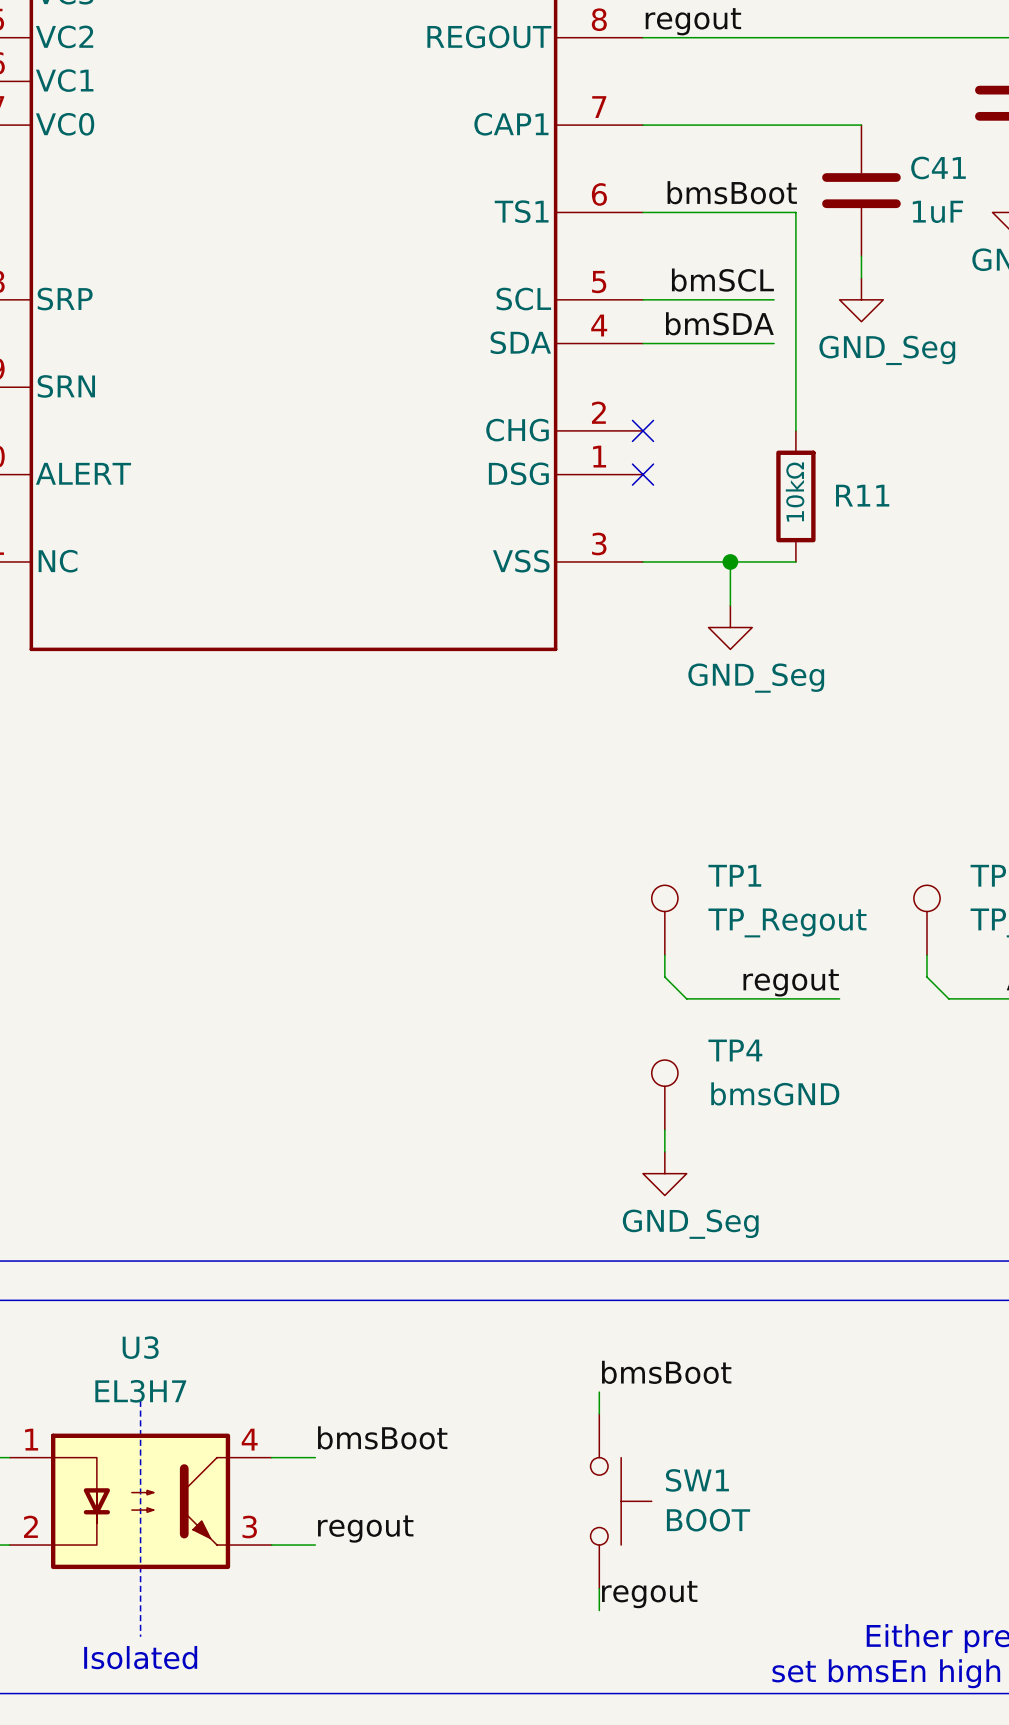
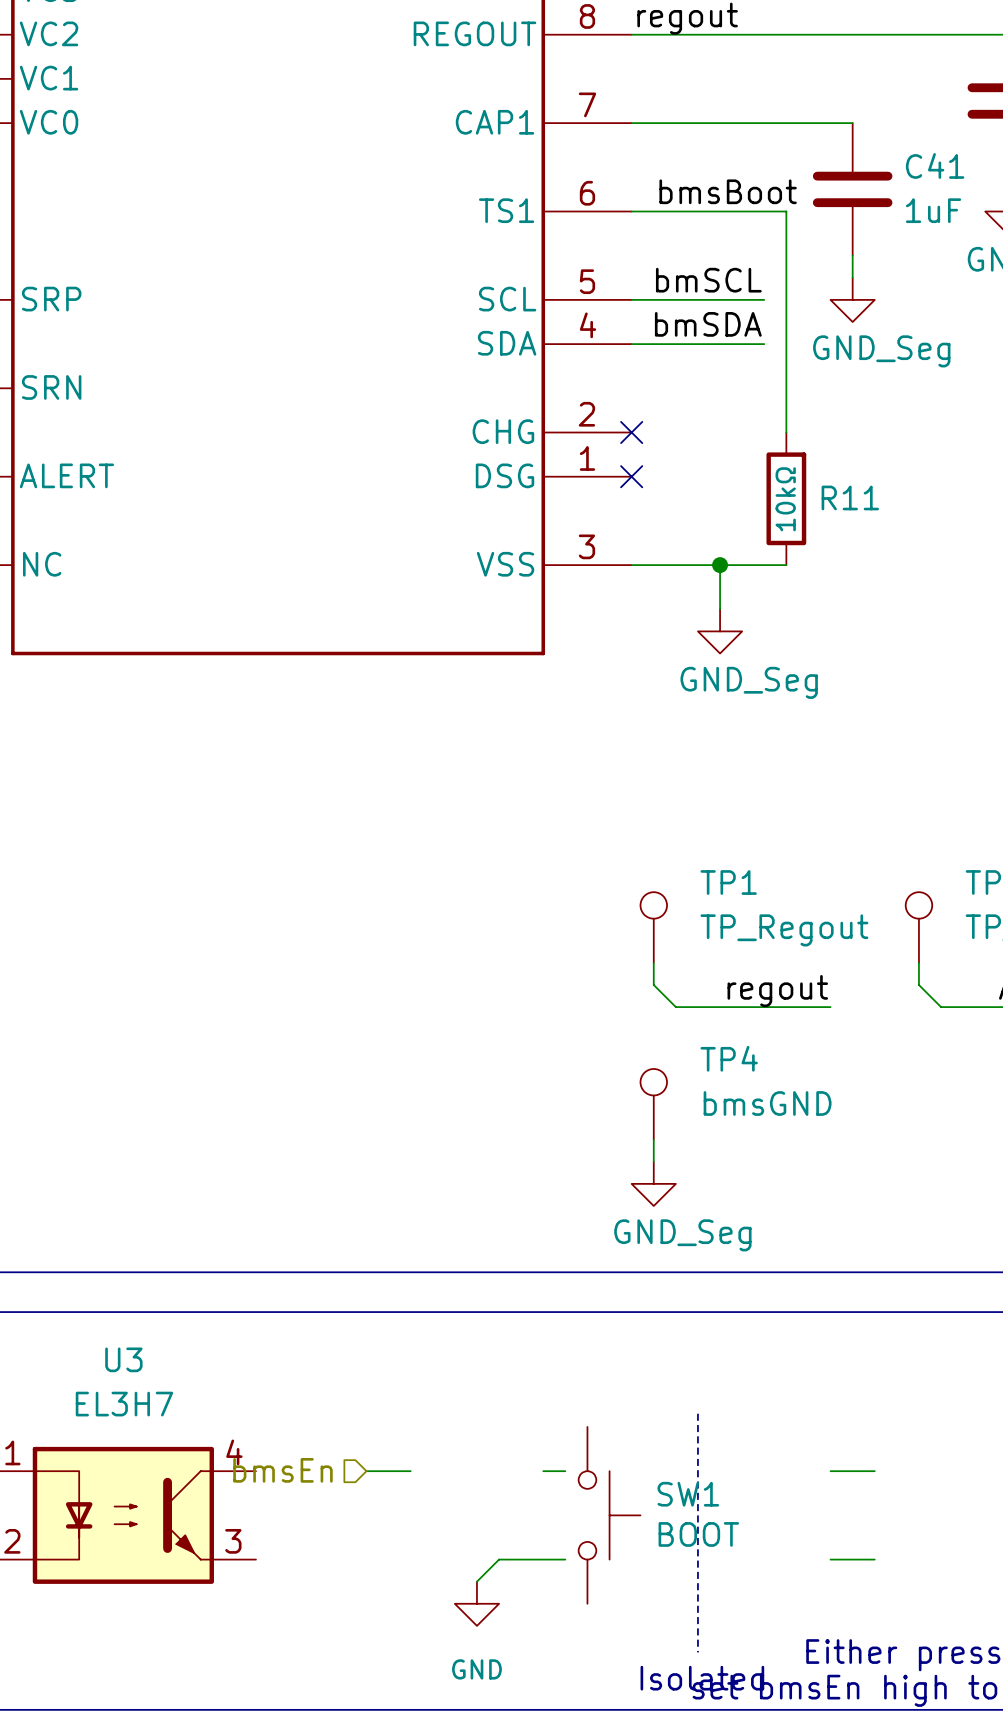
label: bmsBoot (666, 1372) -> none
wire: (599, 1392) (599, 1413) -> none
line: (140, 1400) (140, 1636) -> none
line: none -> (697, 1413) (697, 1652)
label: bmsBoot (382, 1437) -> none
hierarchical label: none -> bmsEn (282, 1470)
wire: (271, 1457) (315, 1457) -> (366, 1471) (410, 1471)
wire: none -> (543, 1471) (565, 1471)
wire: none -> (830, 1471) (874, 1471)
label: regout (365, 1529) -> none
wire: (271, 1545) (315, 1545) -> none
wire: none -> (565, 1559) (499, 1559) (476, 1581)
wire: none -> (830, 1559) (874, 1559)
power symbol: none -> GND (476, 1603)
wire: (599, 1588) (599, 1610) -> none
label: regout (649, 1594) -> none
text: Isolated (140, 1657) -> none
text: none -> Isolated (702, 1678)

